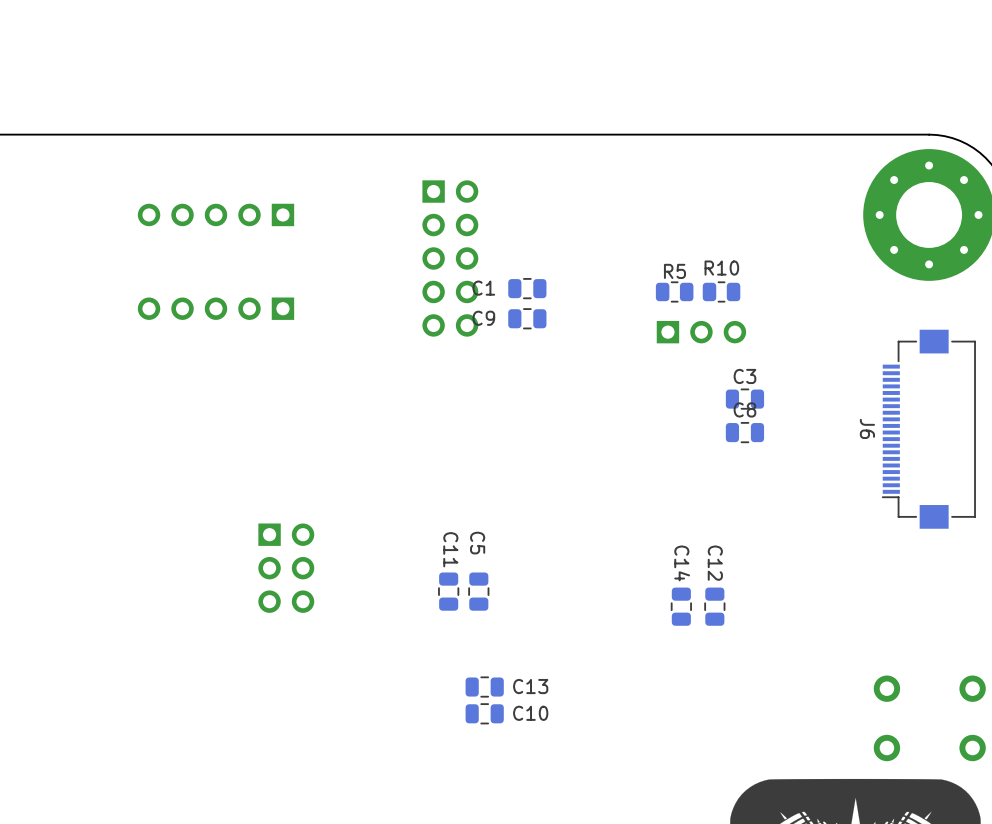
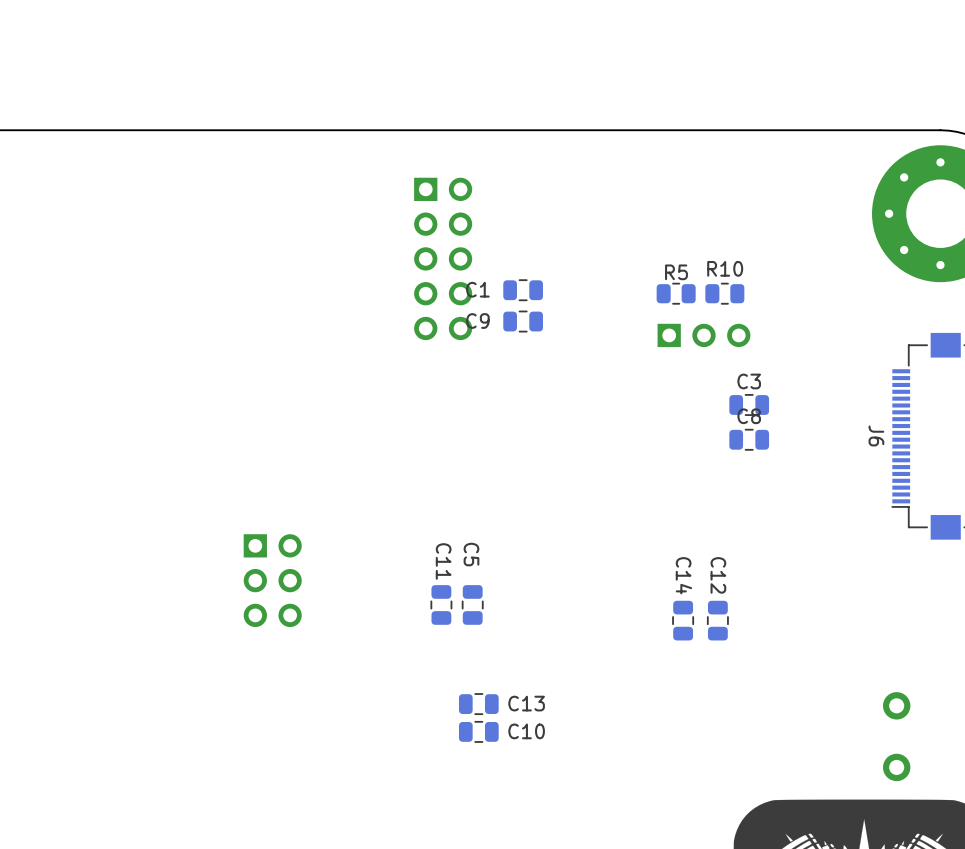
part: (215, 214) -> none
part: (215, 308) -> none

